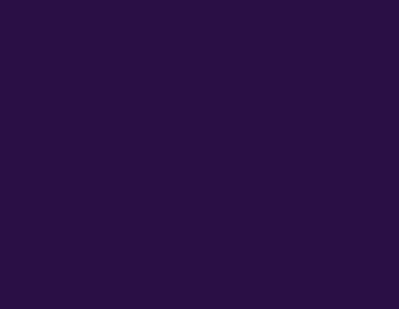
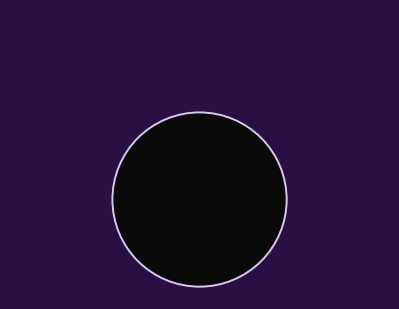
part: none -> (199, 199)

